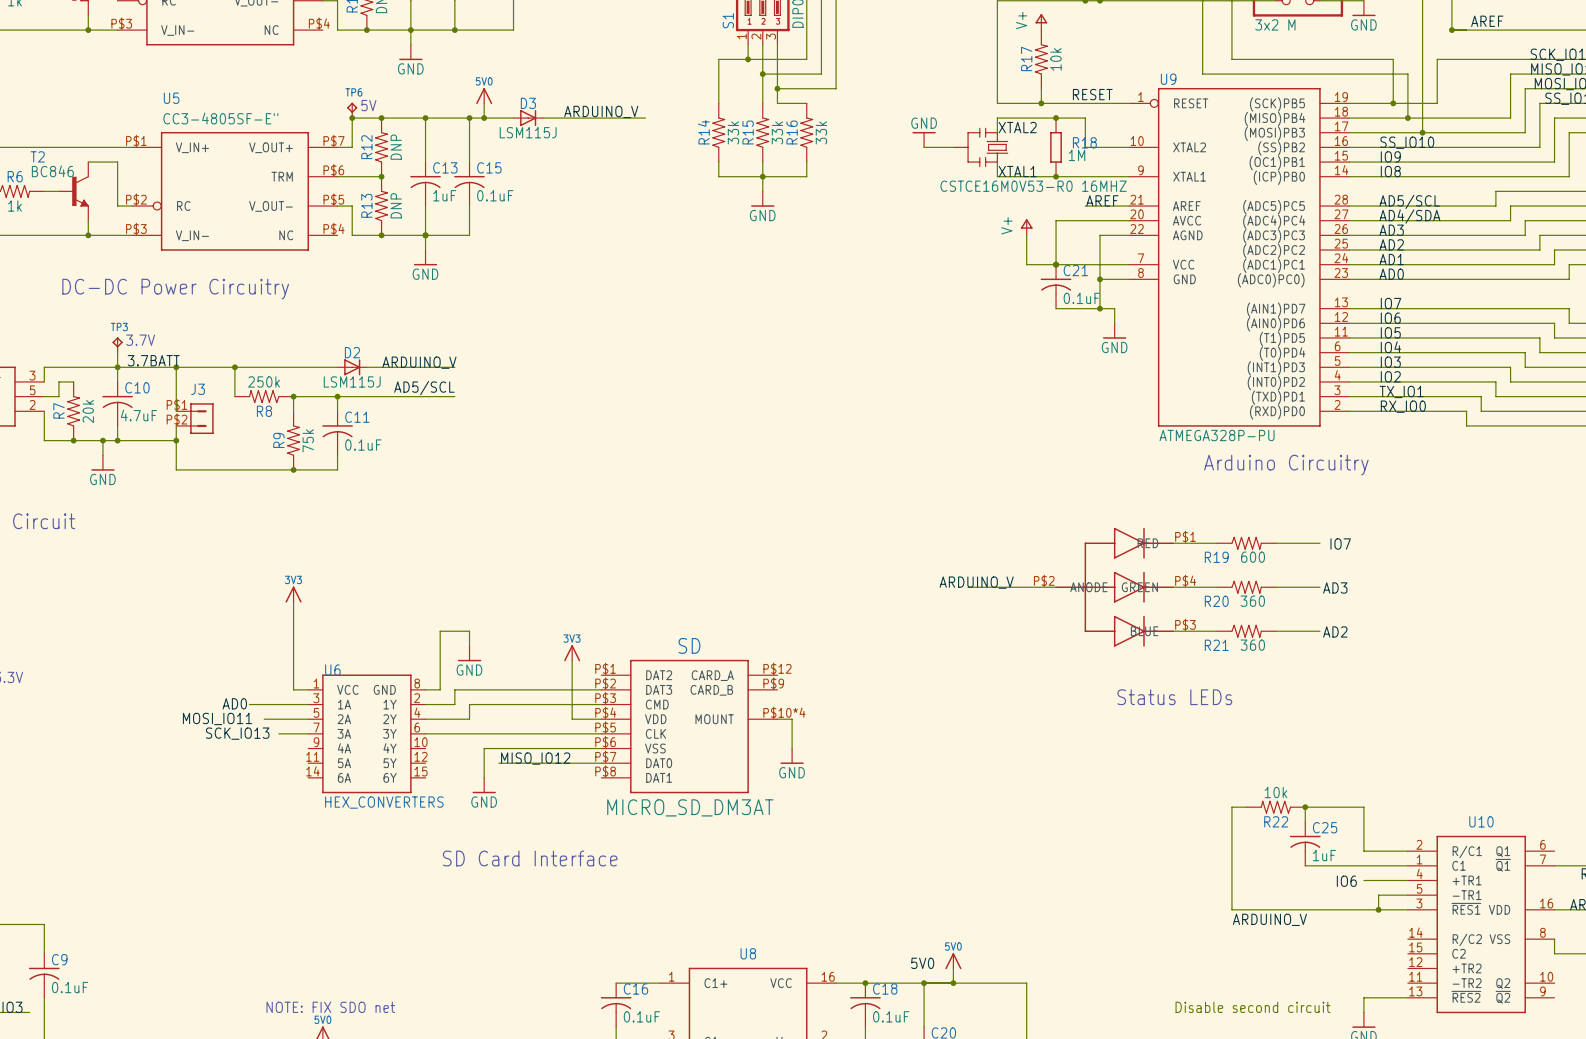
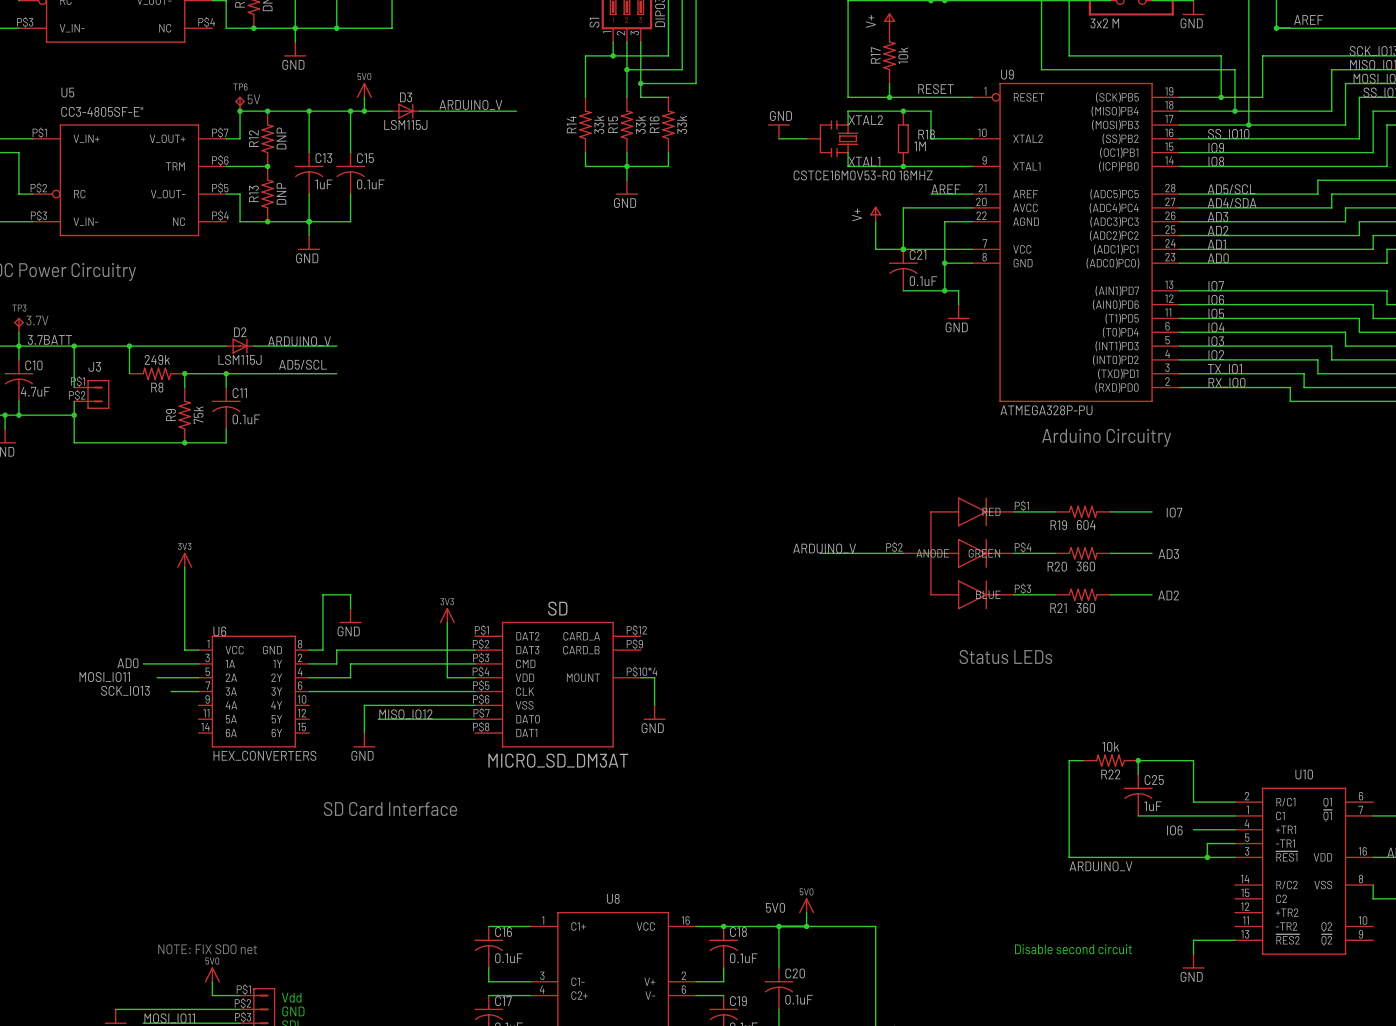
R8 value: 250k (264, 381) -> 249k (157, 359)
R19 value: 600 (1253, 557) -> 604 (1086, 525)

